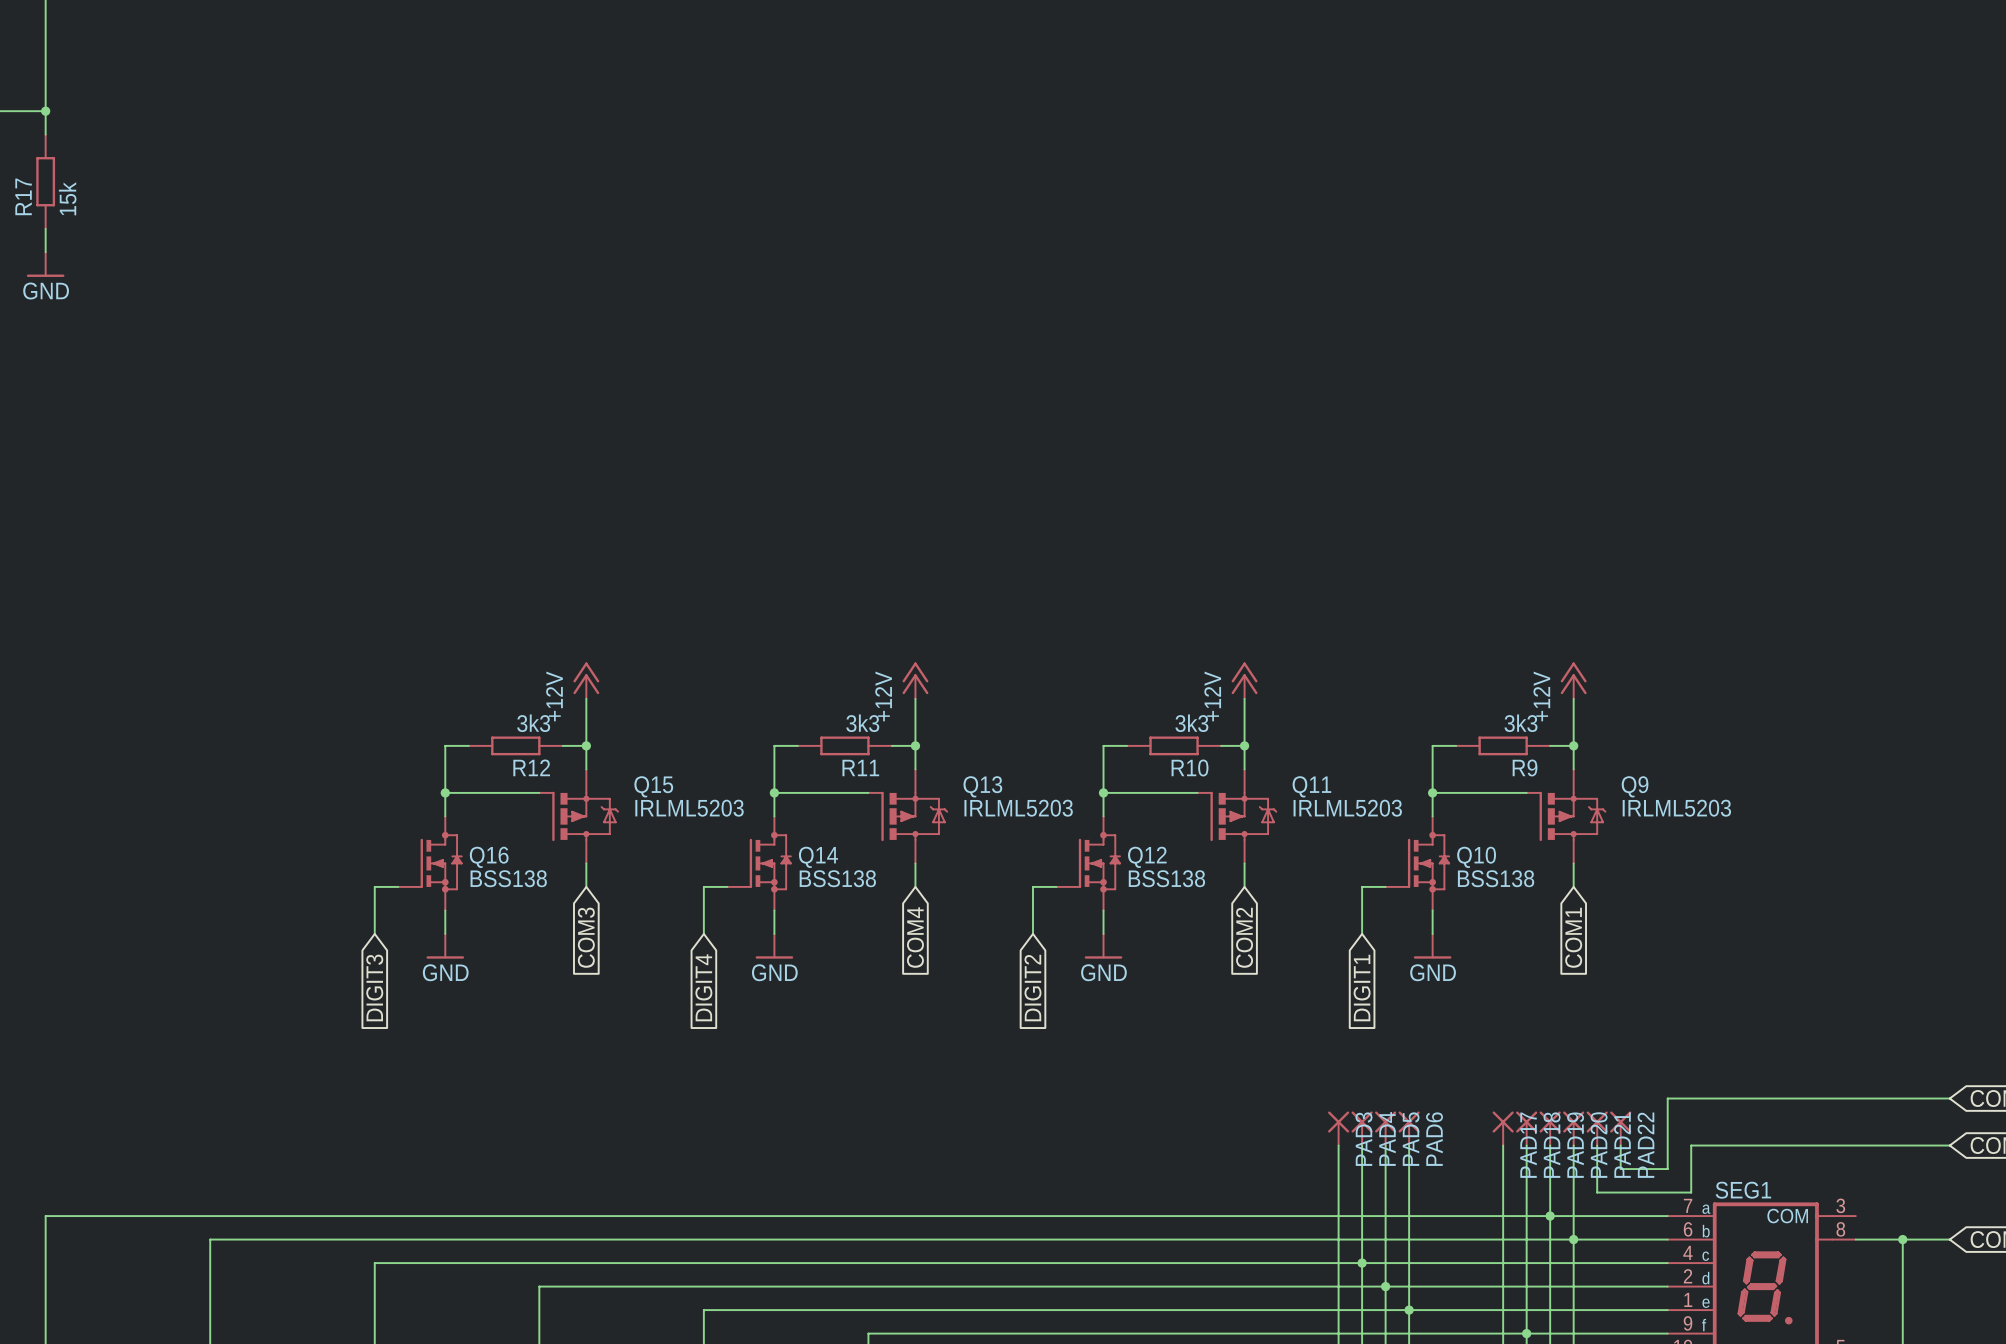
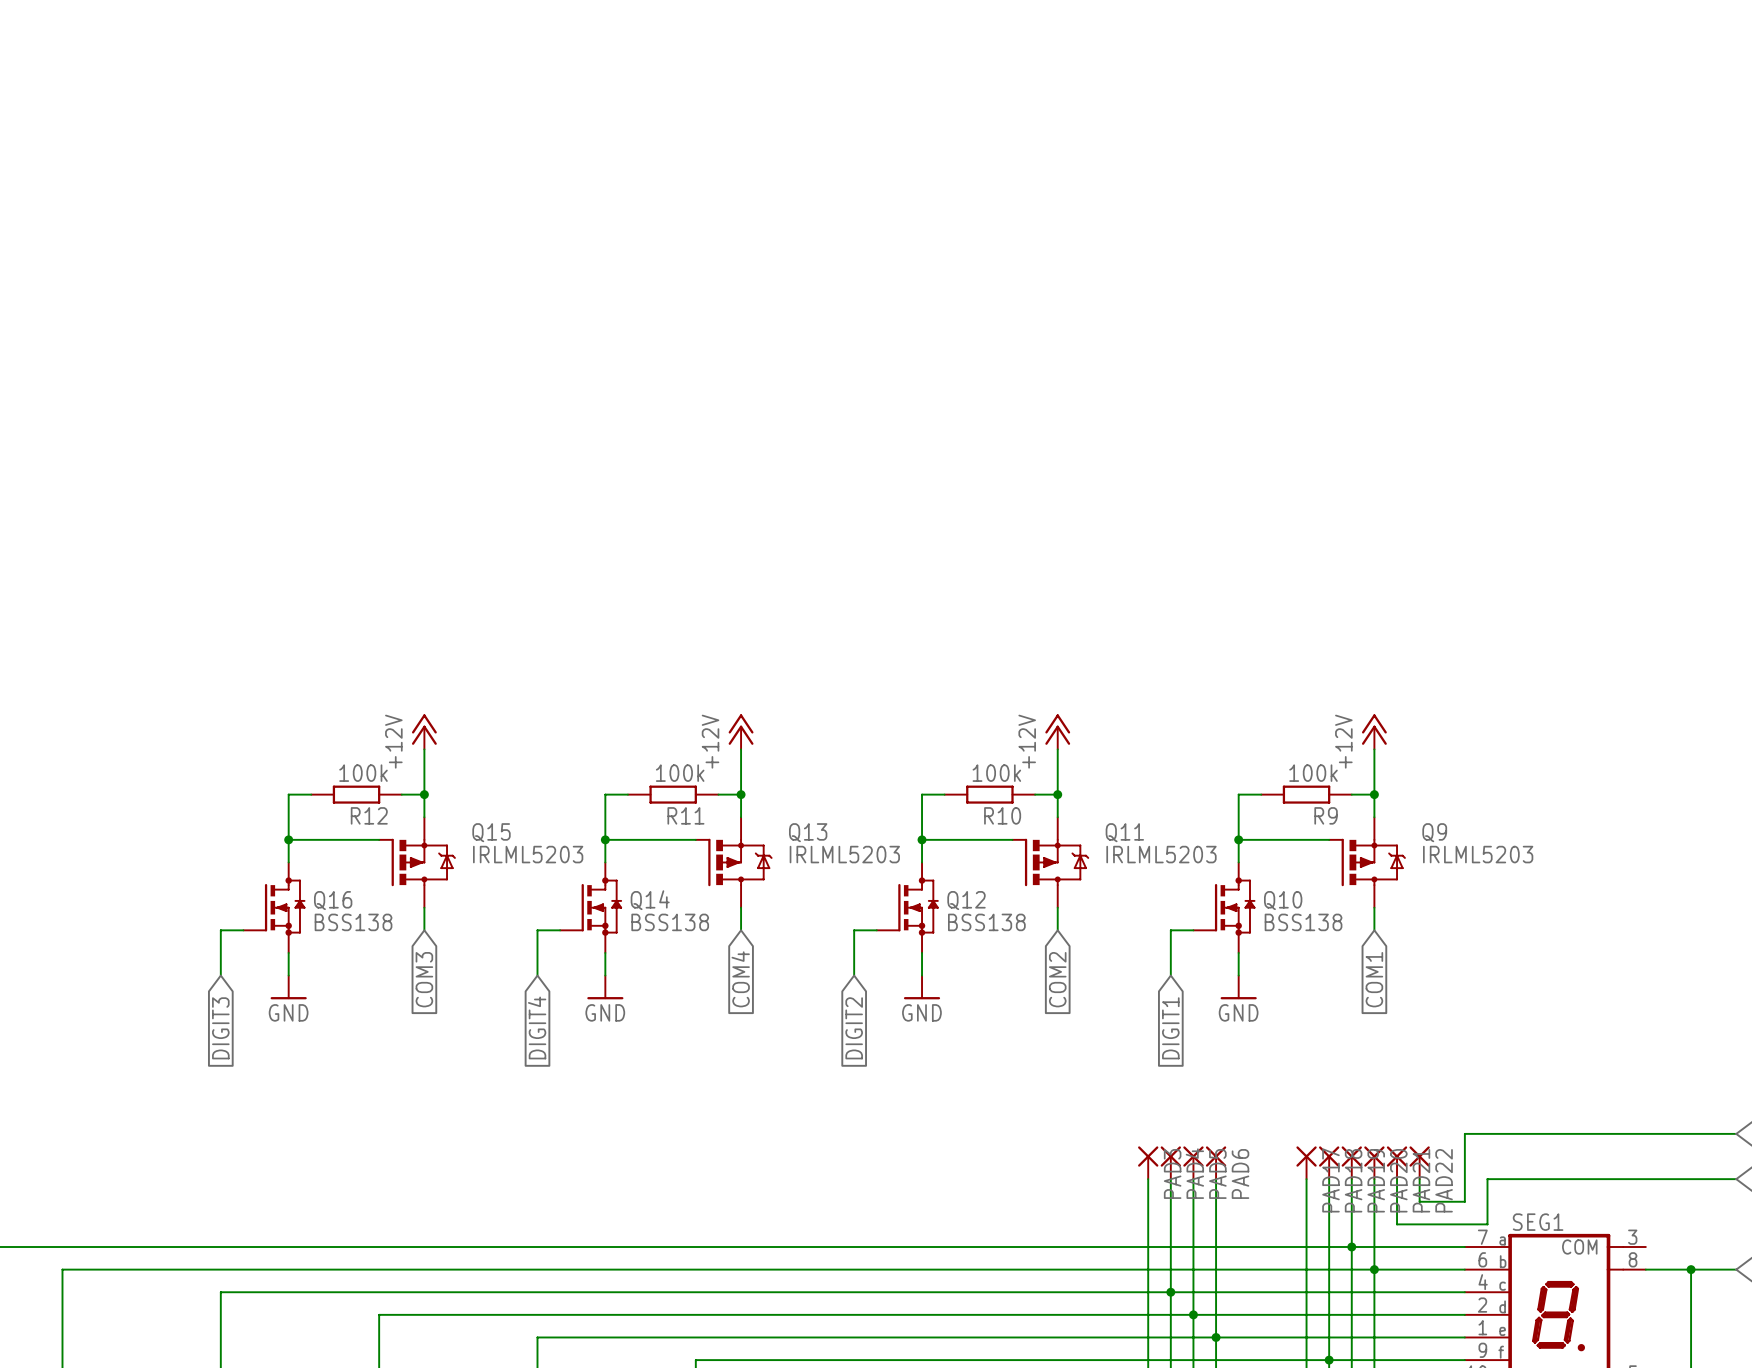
R12 value: 3k3 (533, 723) -> 100k (363, 773)
R11 value: 3k3 (862, 723) -> 100k (680, 773)
R10 value: 3k3 (1191, 723) -> 100k (996, 773)
R9 value: 3k3 (1520, 723) -> 100k (1313, 773)

